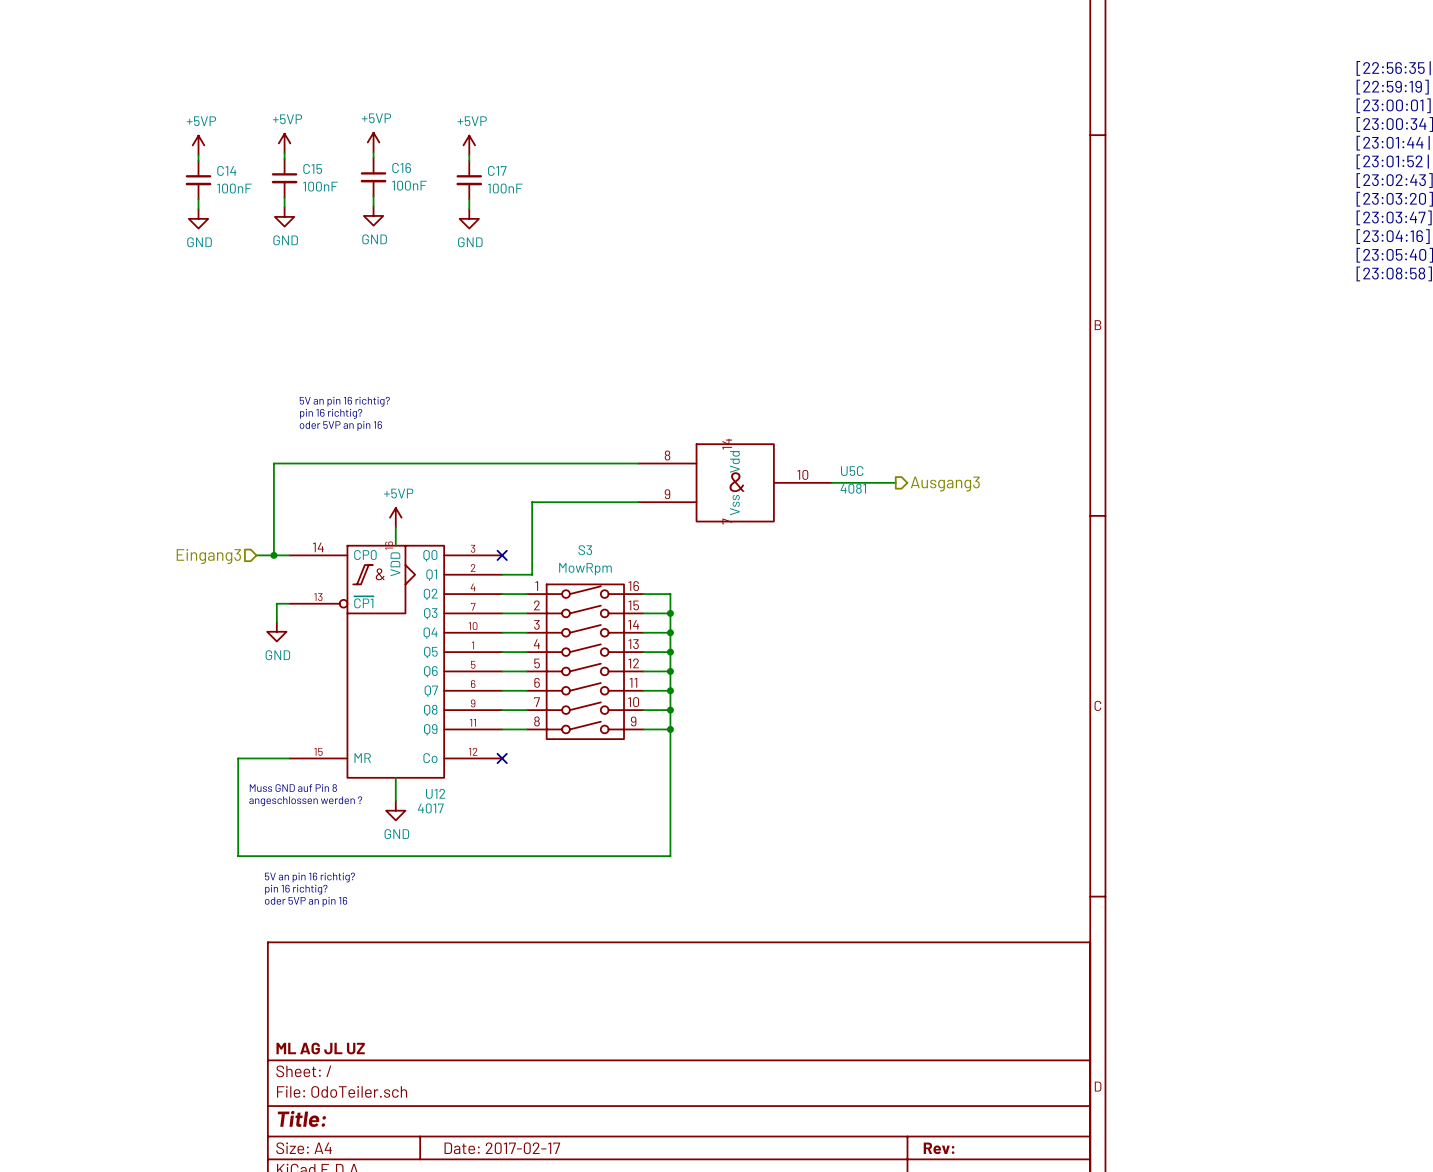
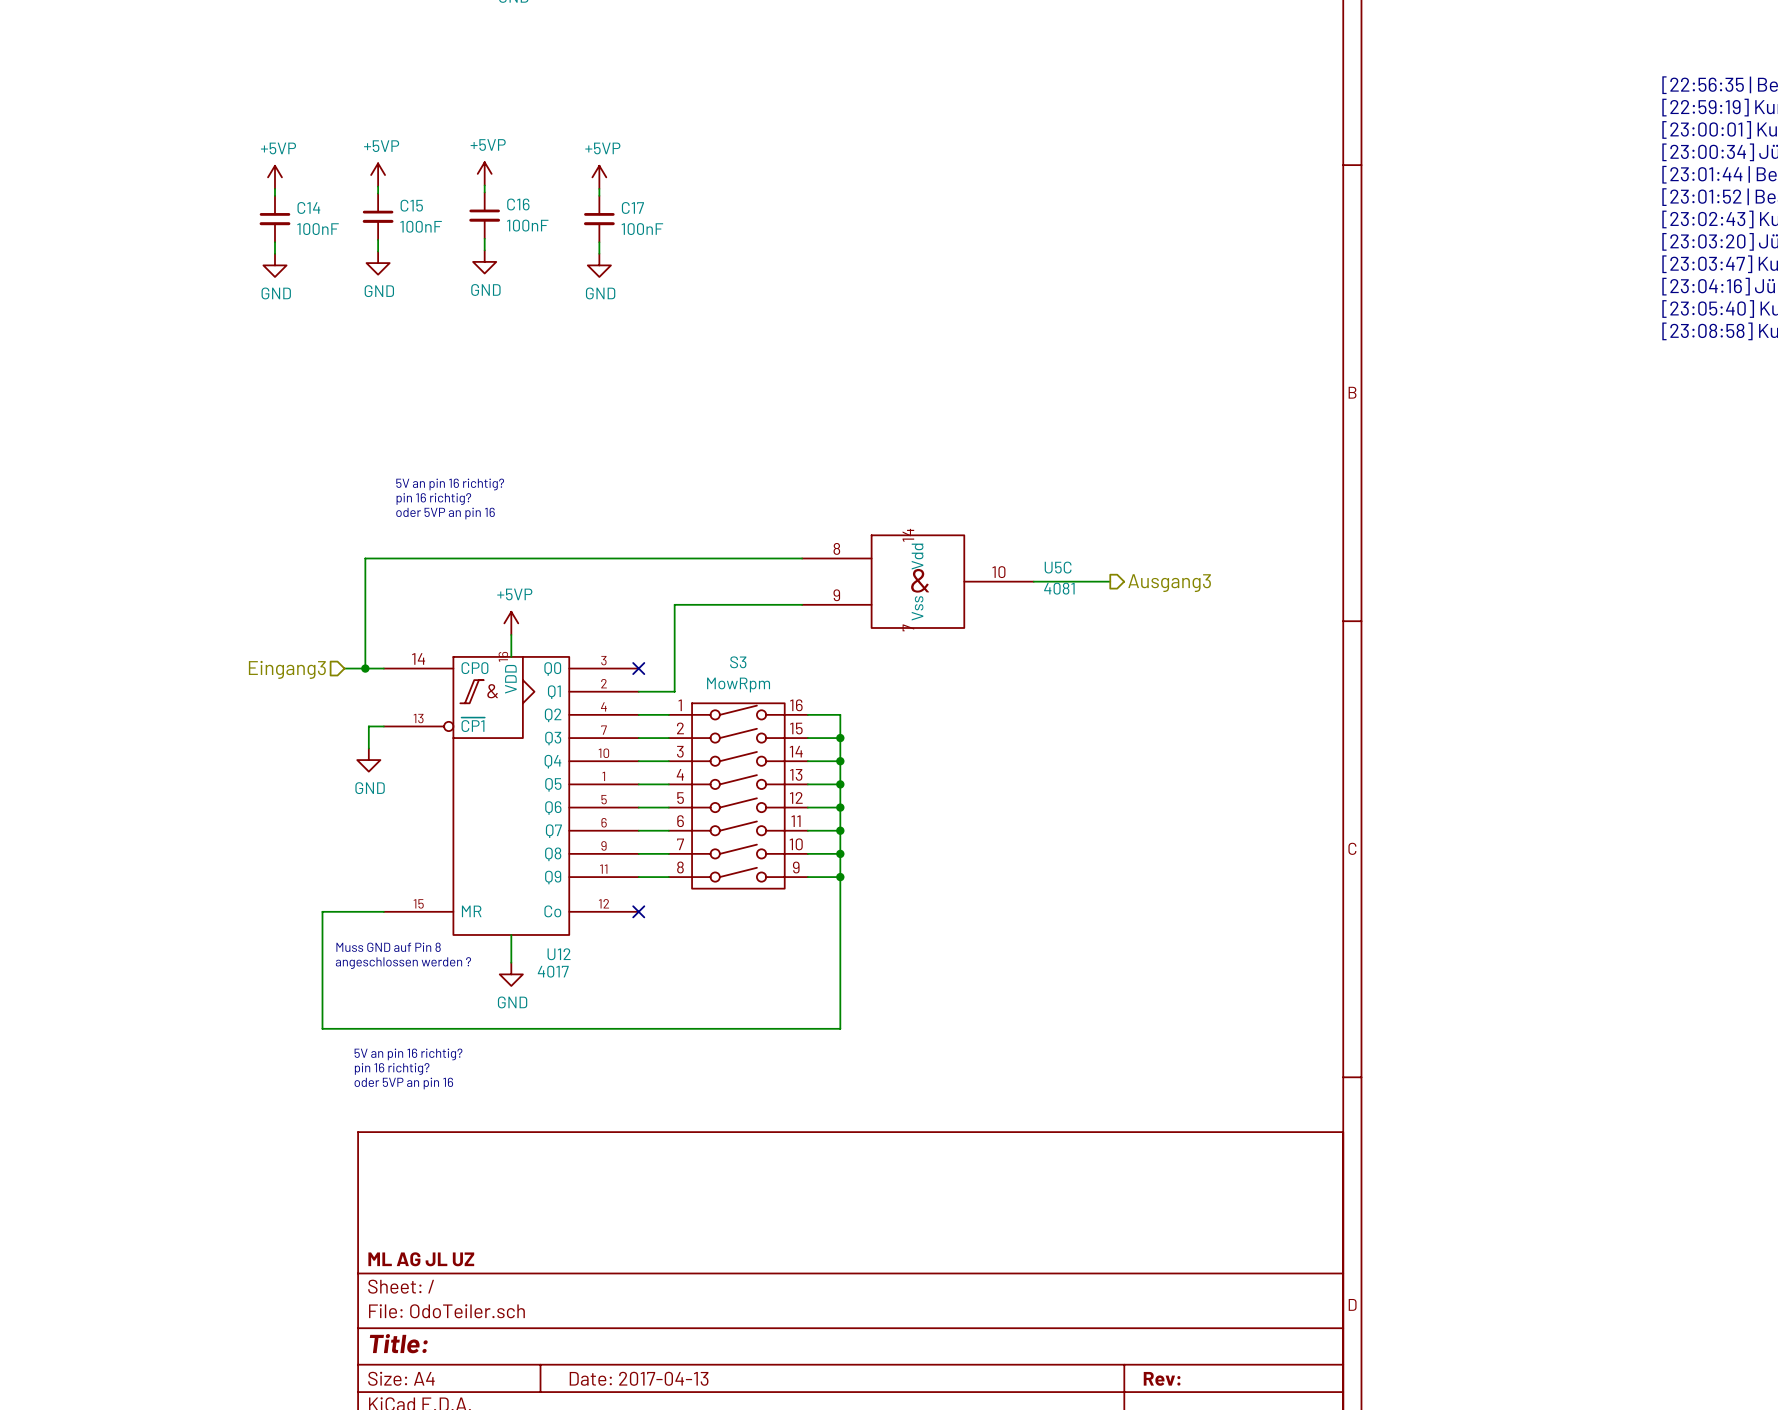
title block: Date: 2017-02-17 (502, 1148) -> Date: 2017-04-13 (639, 1378)

